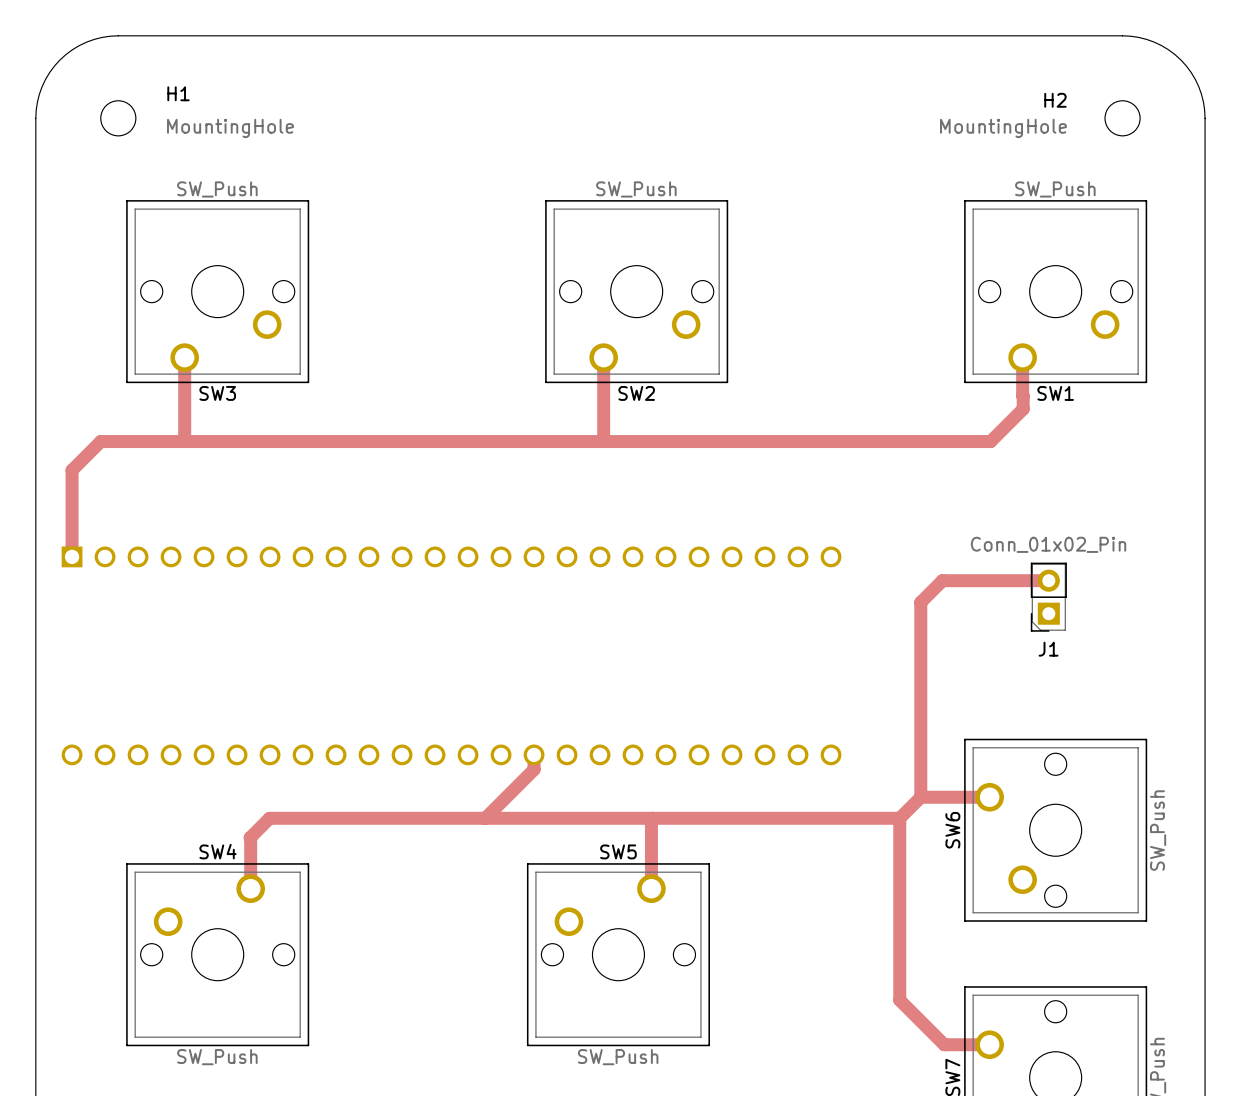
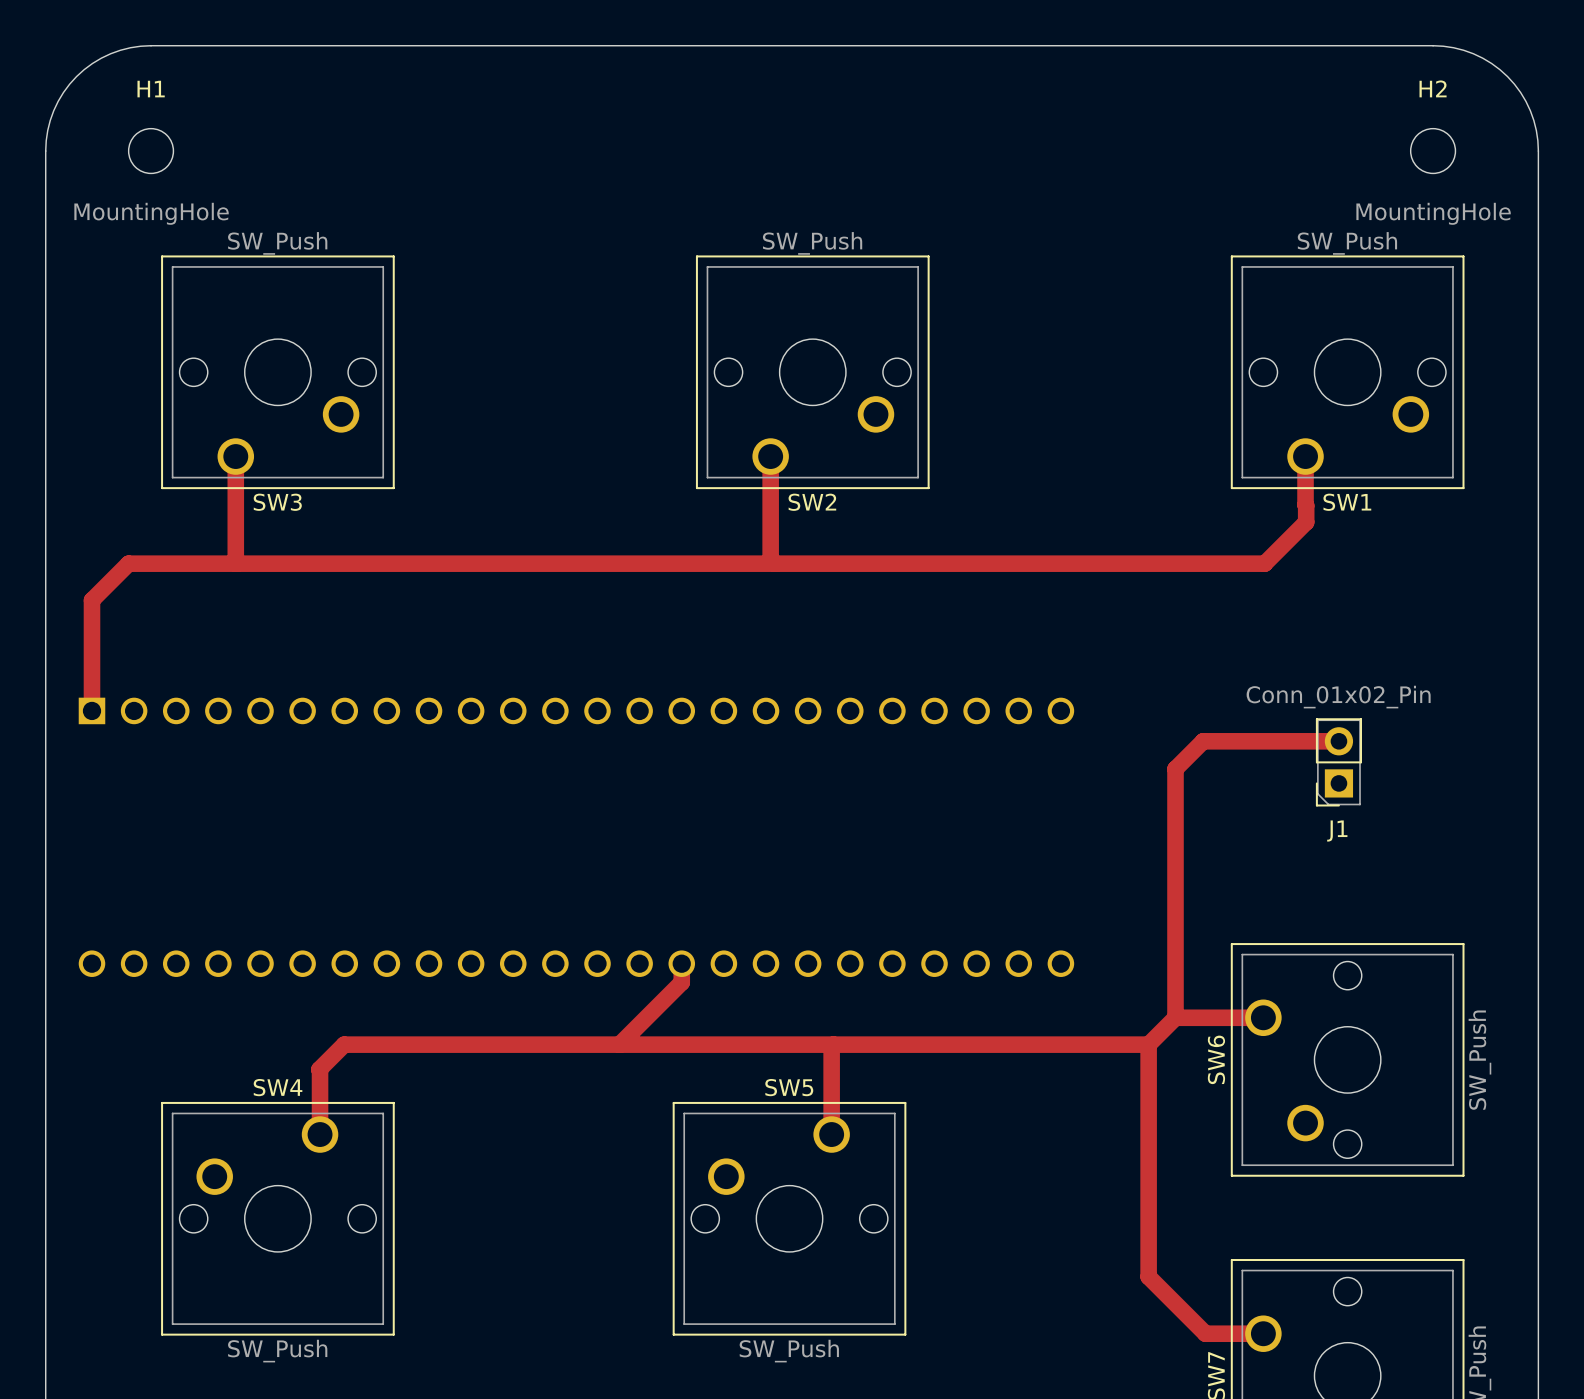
H1 name position: H1 (178, 93) -> H1 (151, 89)
H2 name position: H2 (1055, 100) -> H2 (1433, 88)
H1 value position: MountingHole (230, 128) -> MountingHole (151, 213)
H2 value position: MountingHole (1003, 128) -> MountingHole (1433, 213)

